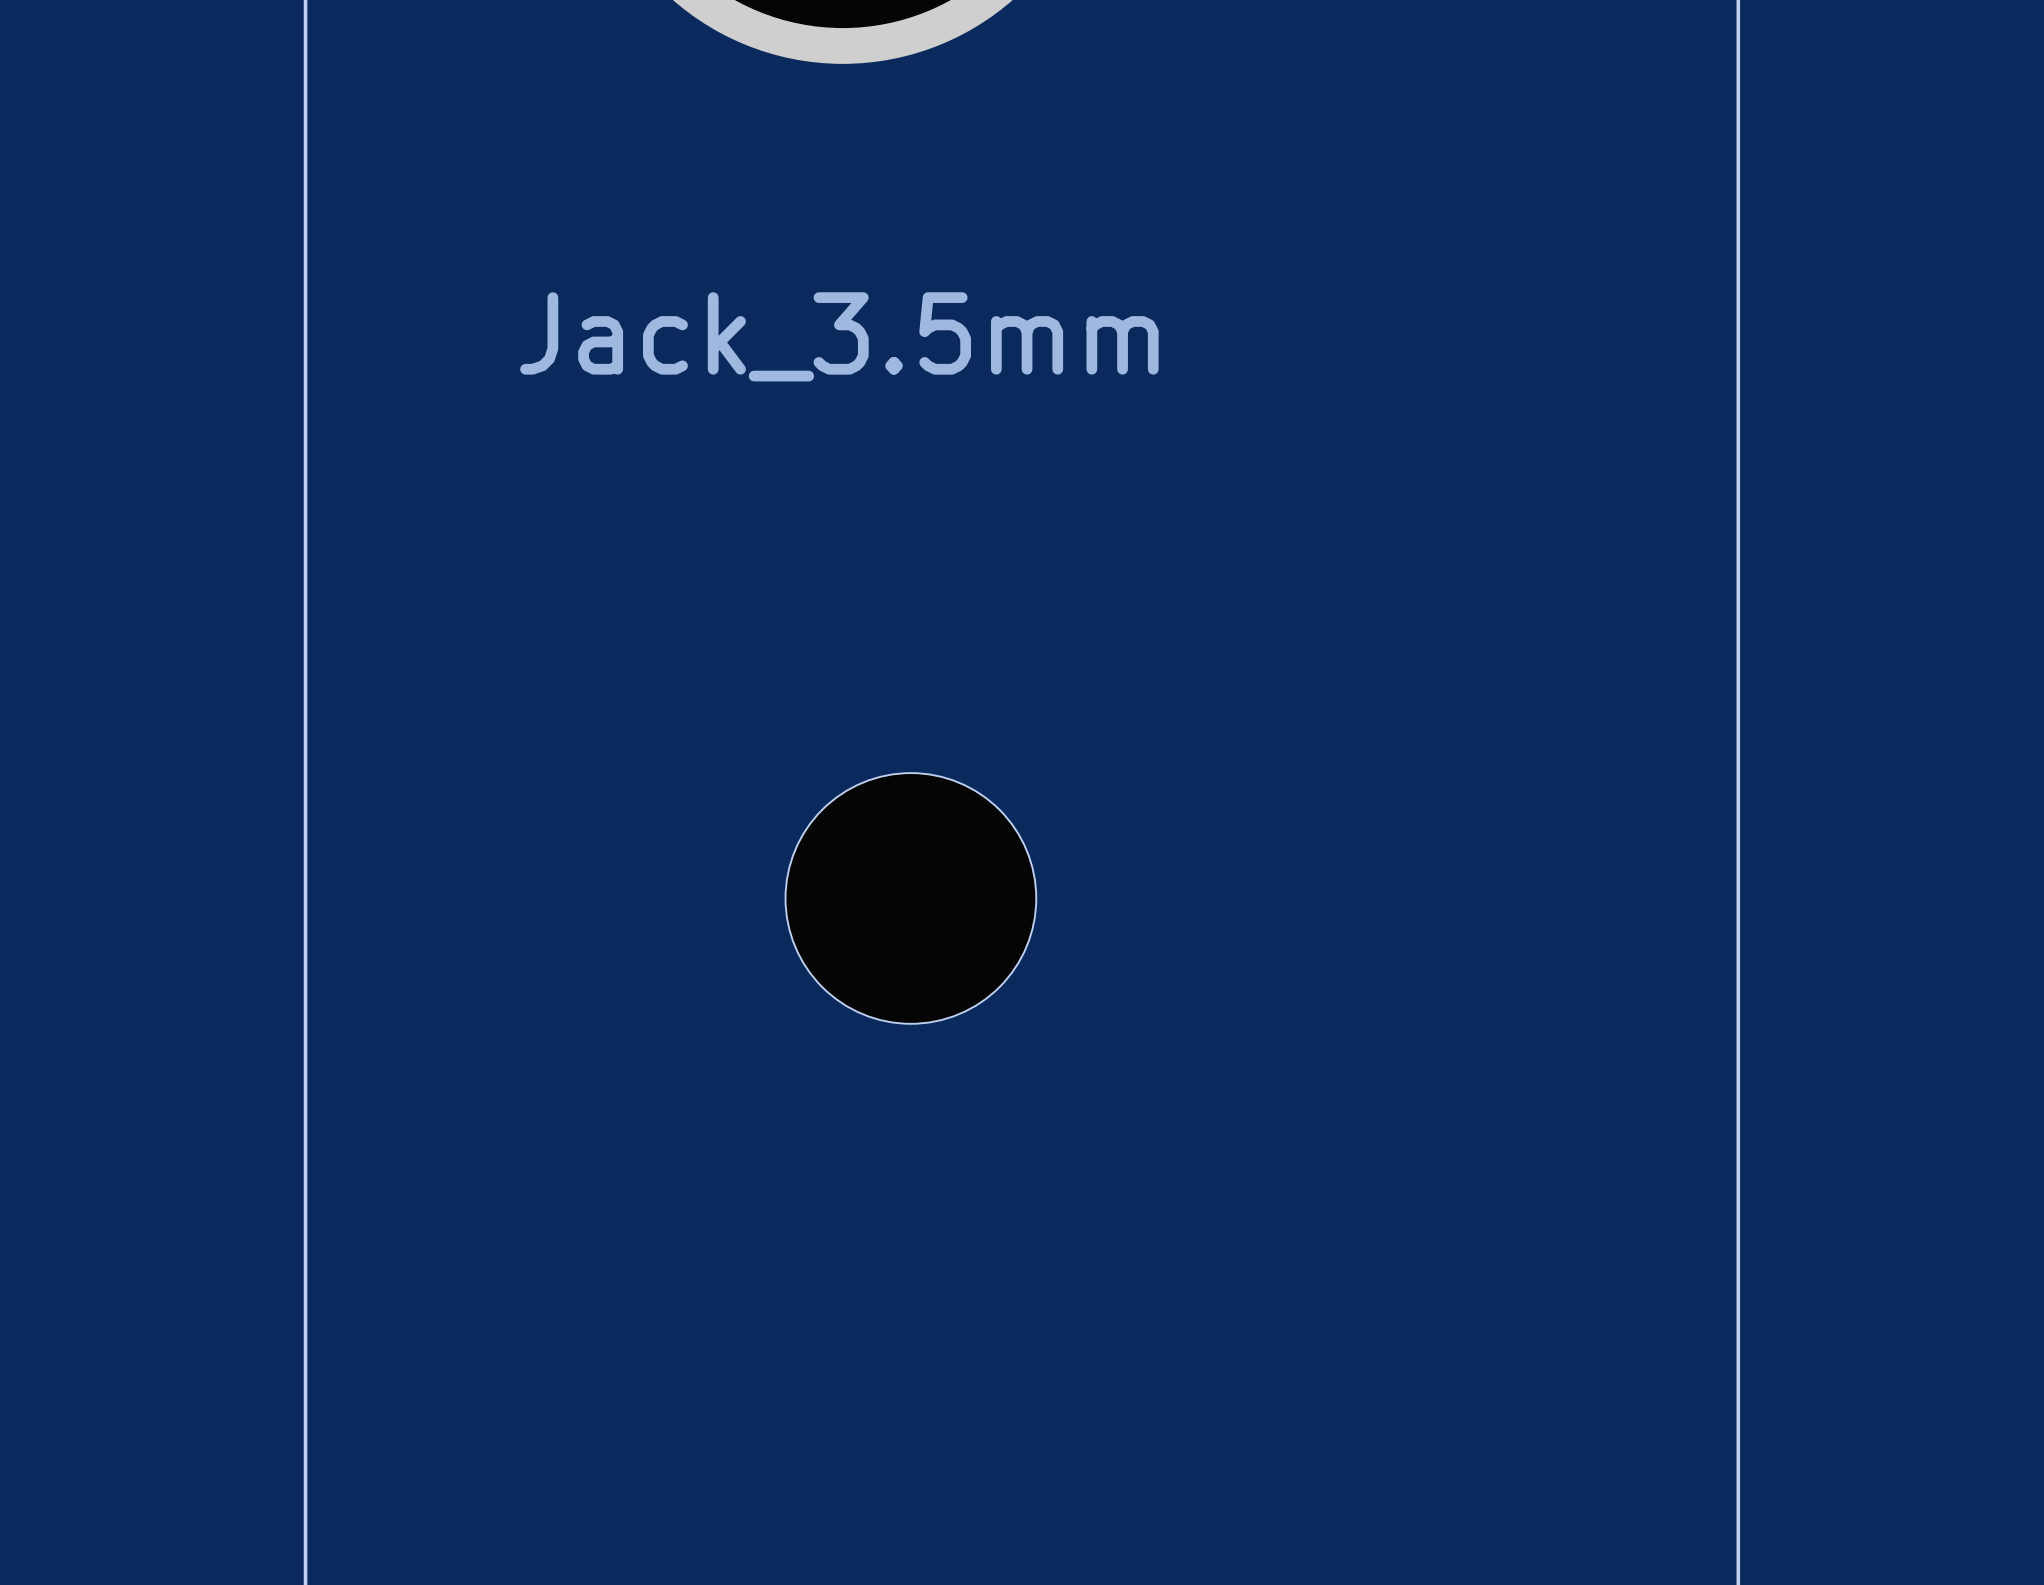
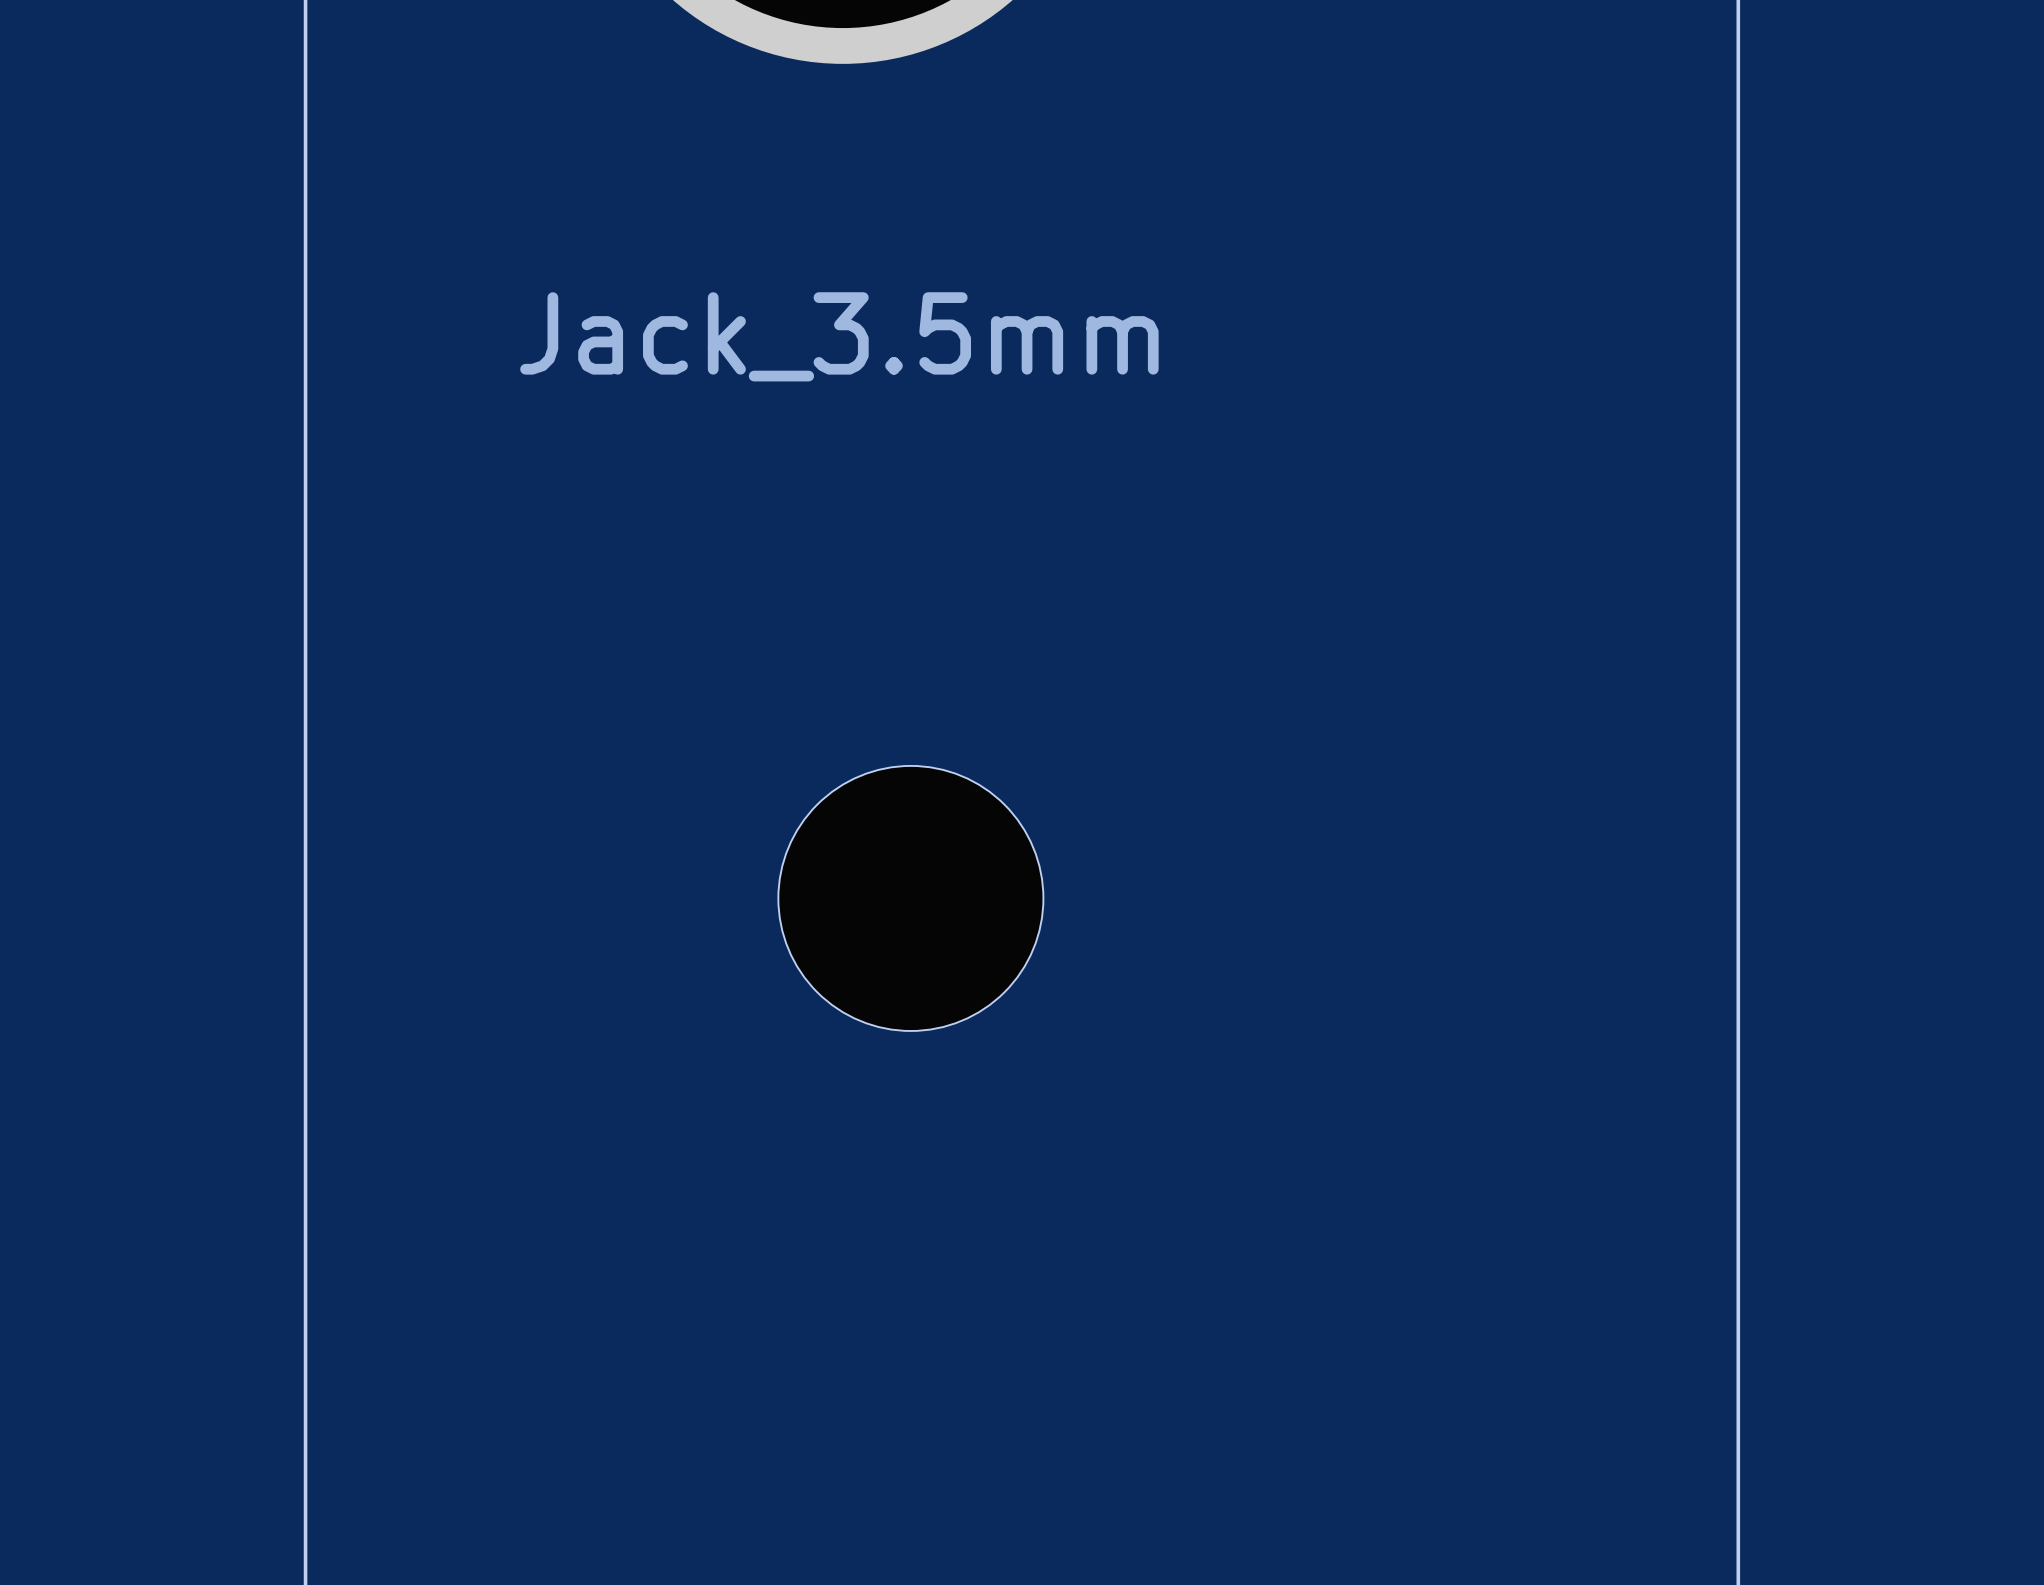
part footprint: [785, 773, 1037, 1024] -> [778, 765, 1044, 1031]

